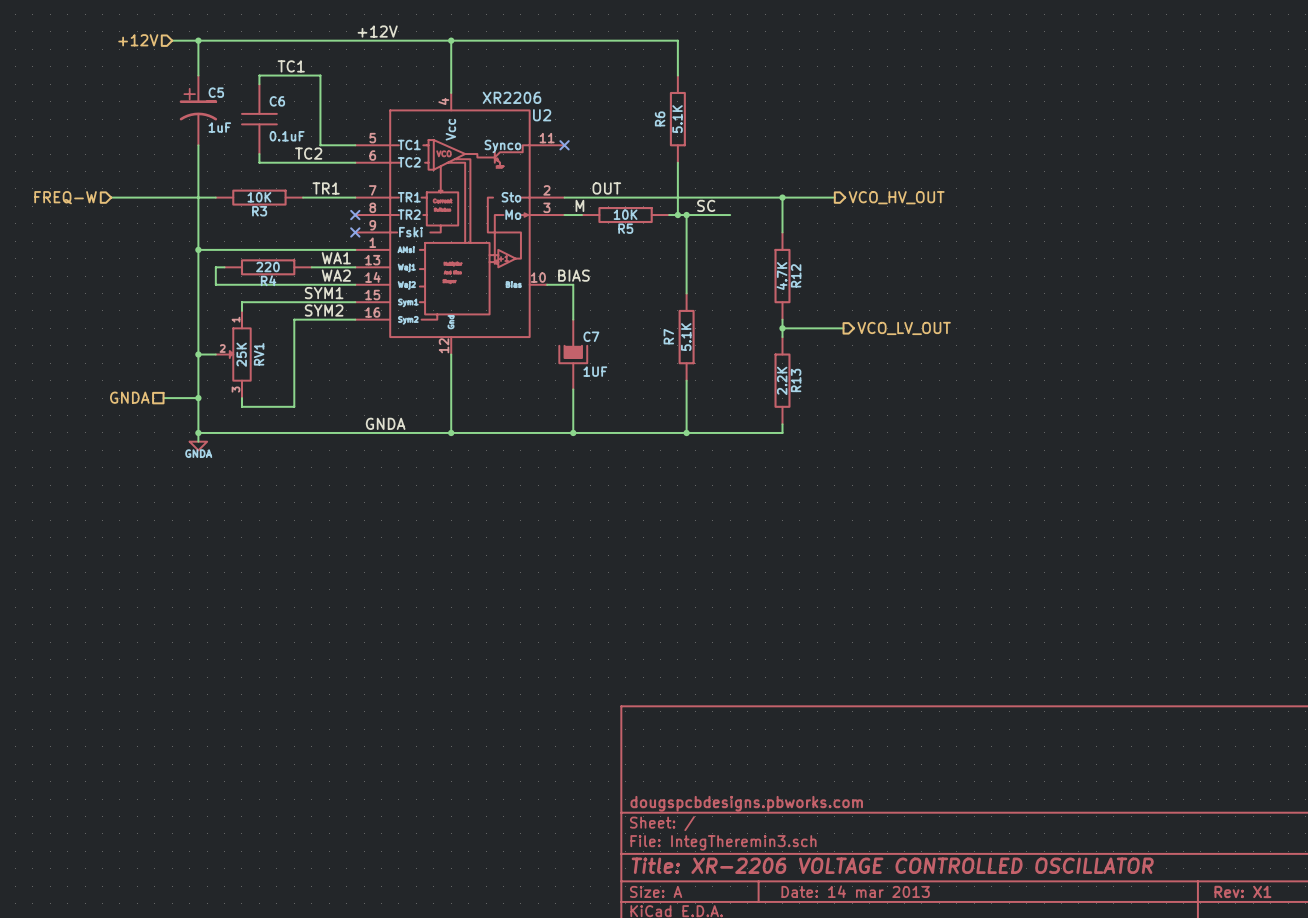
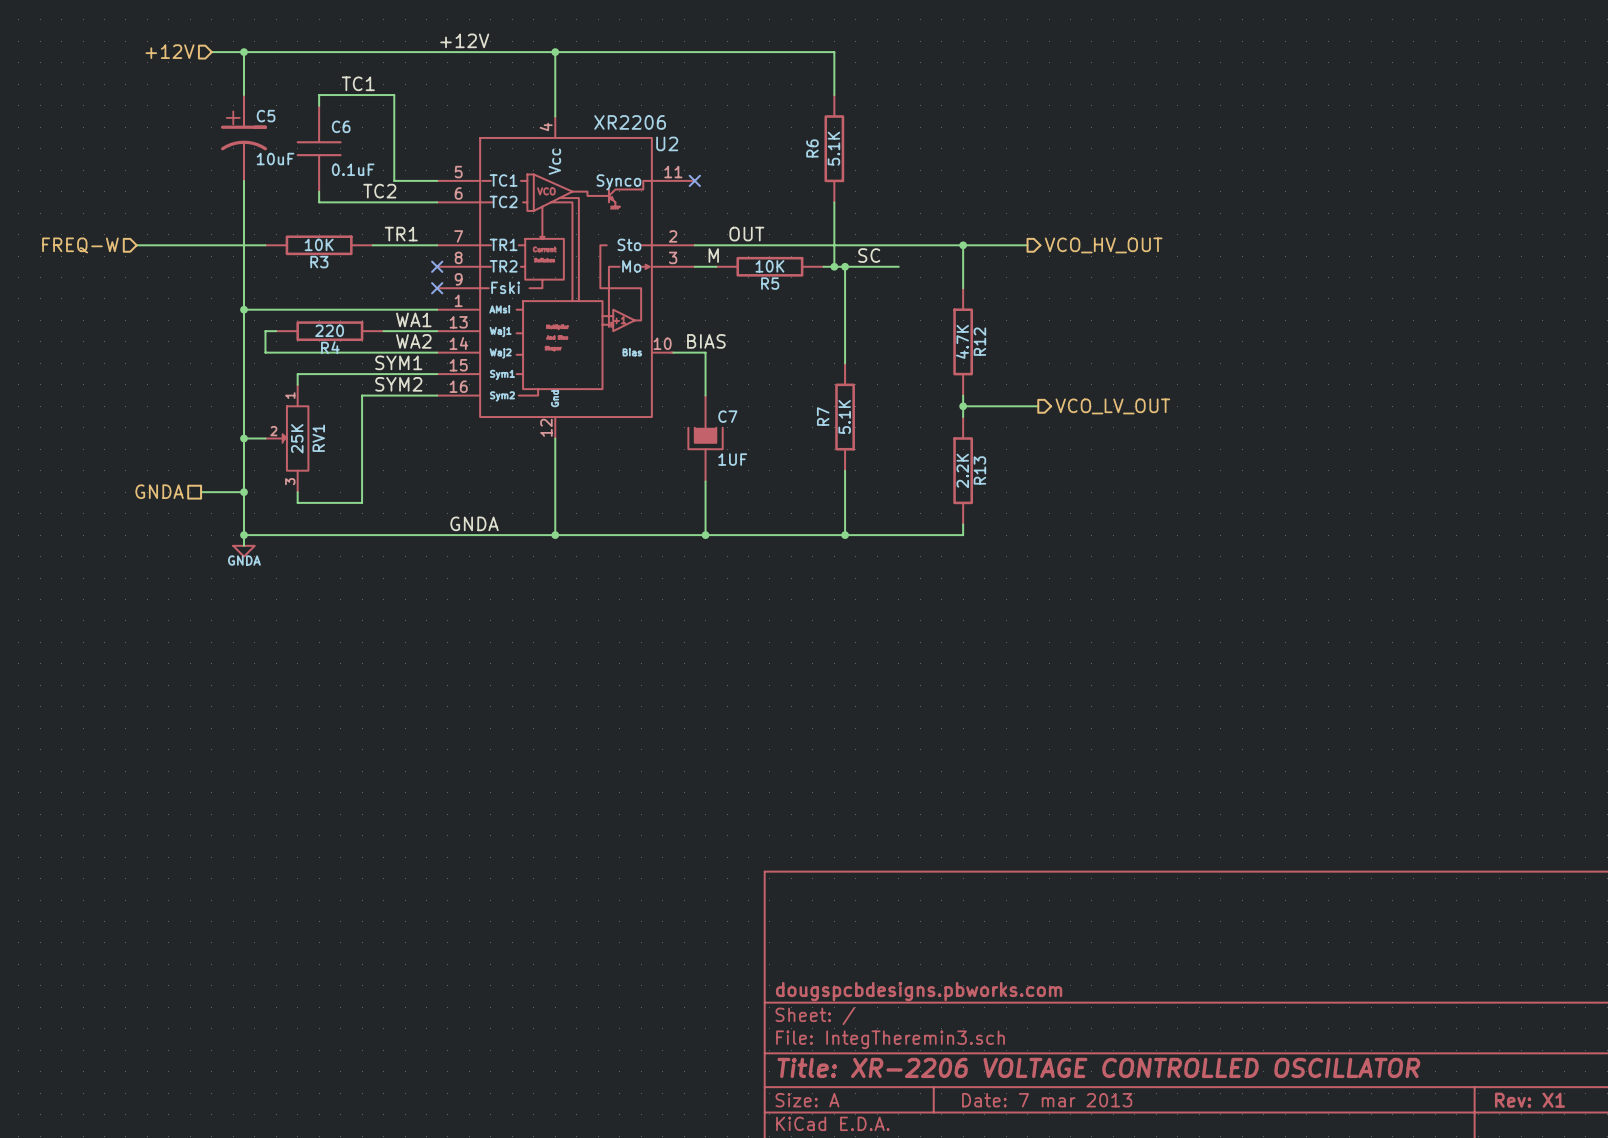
C5 value: 1uF (219, 127) -> 10uF (275, 159)
title block: Date: 14 mar 2013 (855, 891) -> Date: 7 mar 2013 (1047, 1100)

